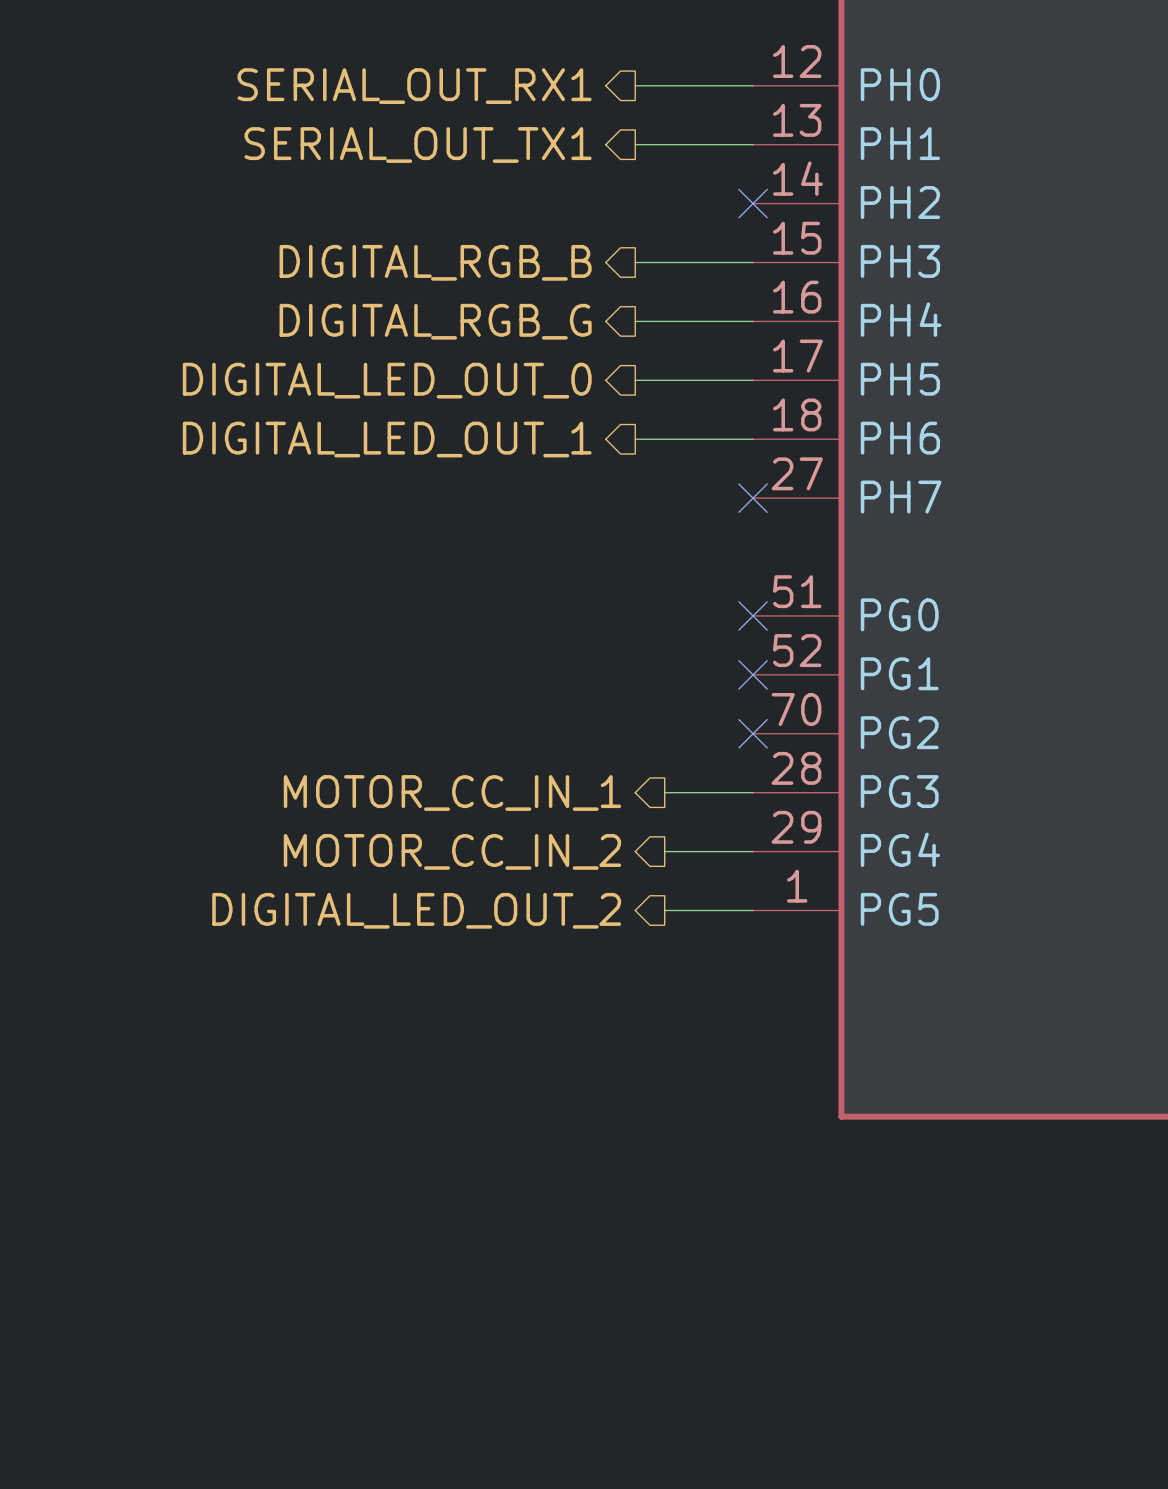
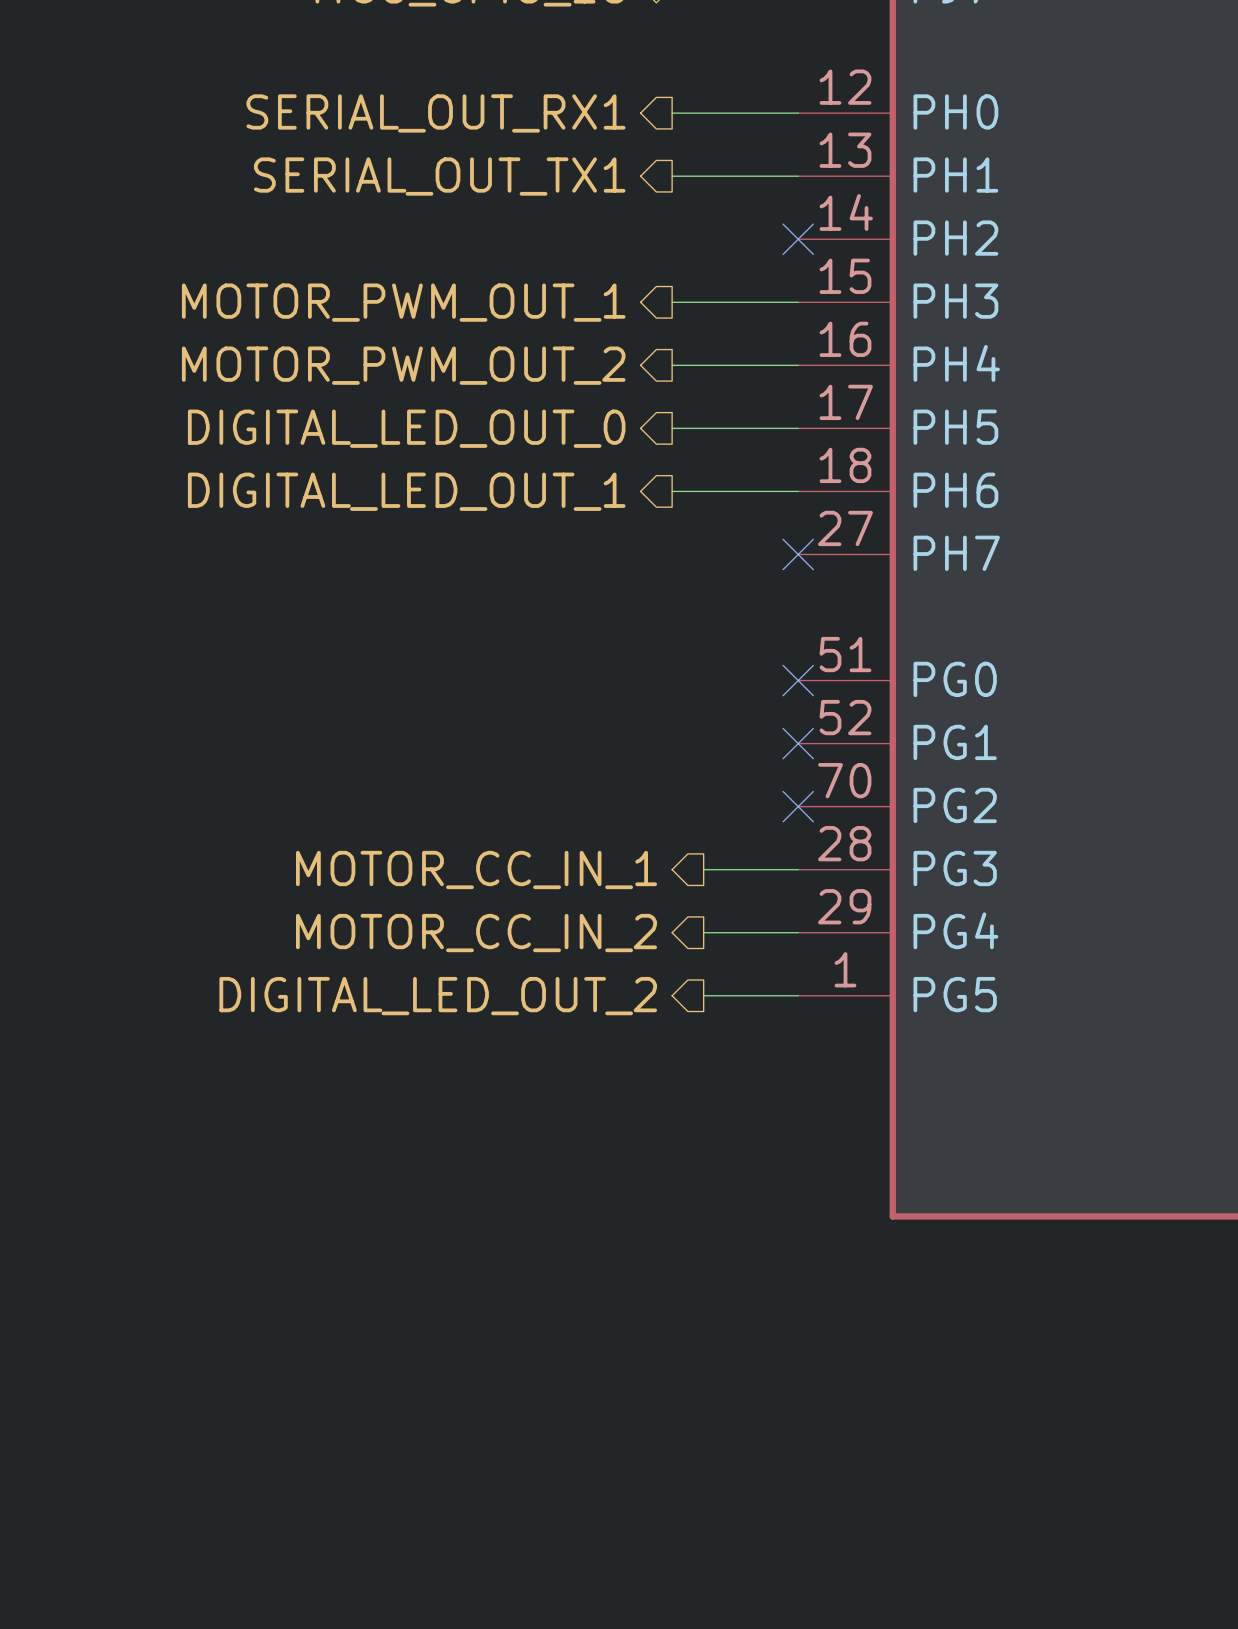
hierarchical label: DIGITAL_RGB_B (435, 262) -> MOTOR_PWM_OUT_1 (403, 302)
hierarchical label: DIGITAL_RGB_G (435, 321) -> MOTOR_PWM_OUT_2 (403, 365)

